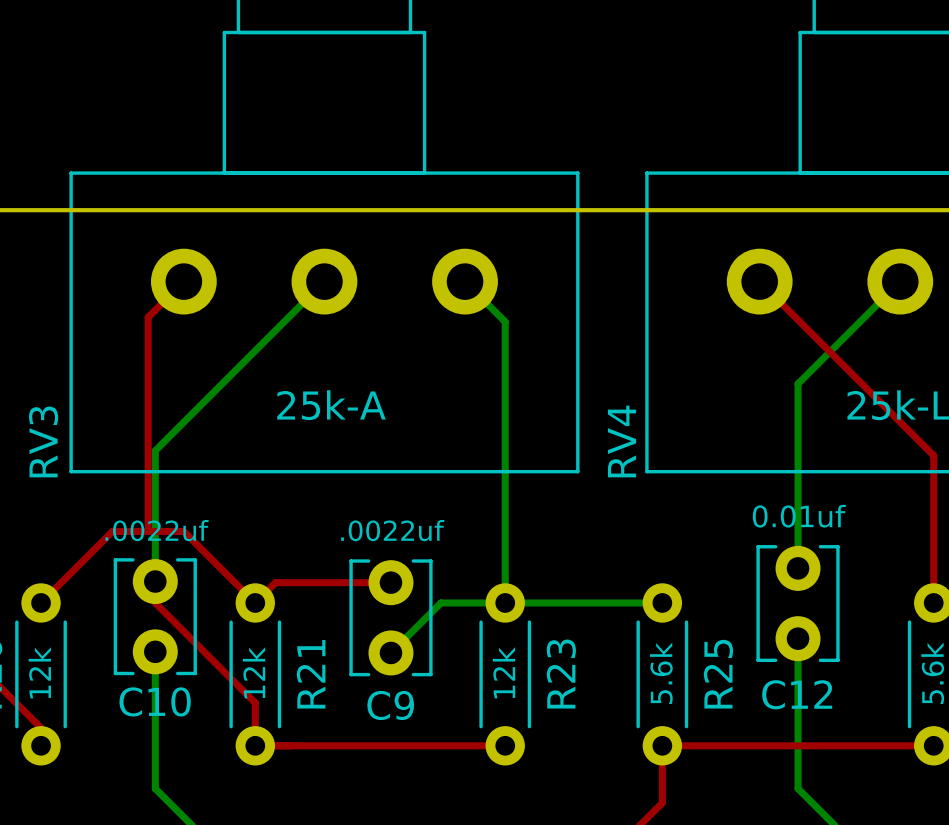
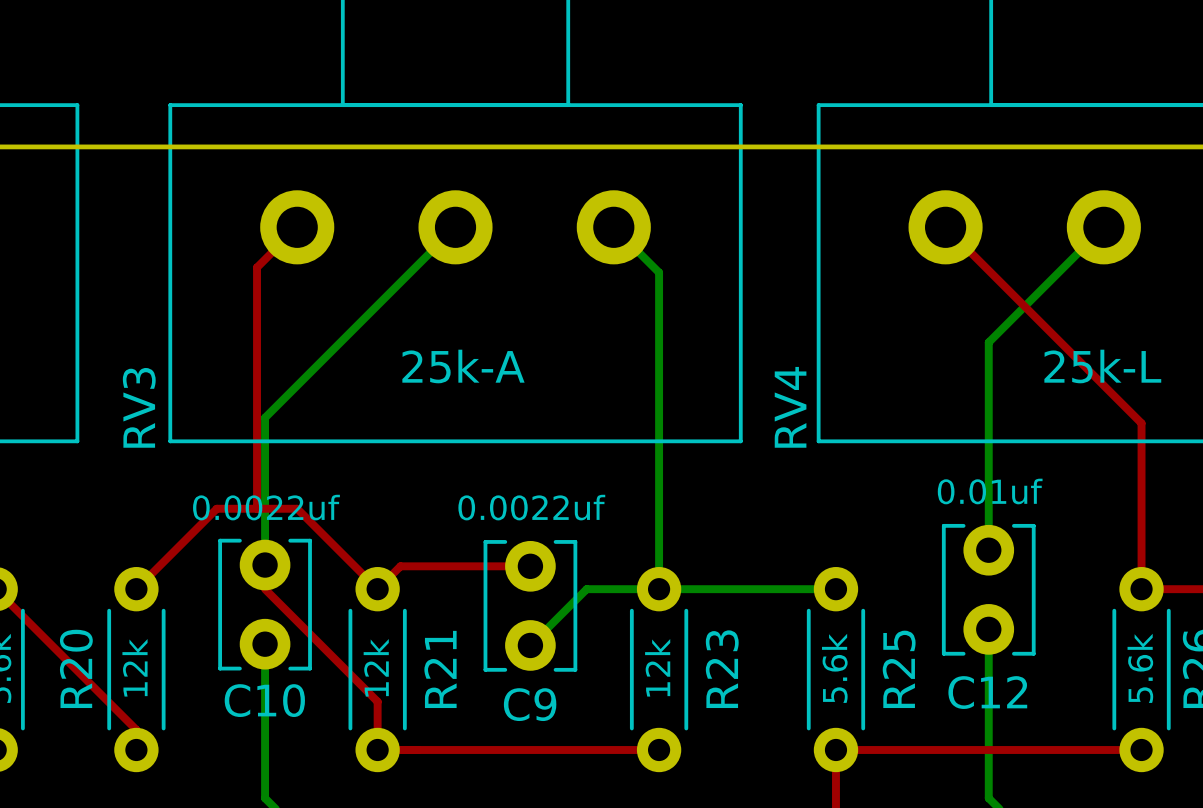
C10 value: .0022uf (157, 530) -> 0.0022uf (266, 507)
C9 value: .0022uf (392, 530) -> 0.0022uf (531, 507)

